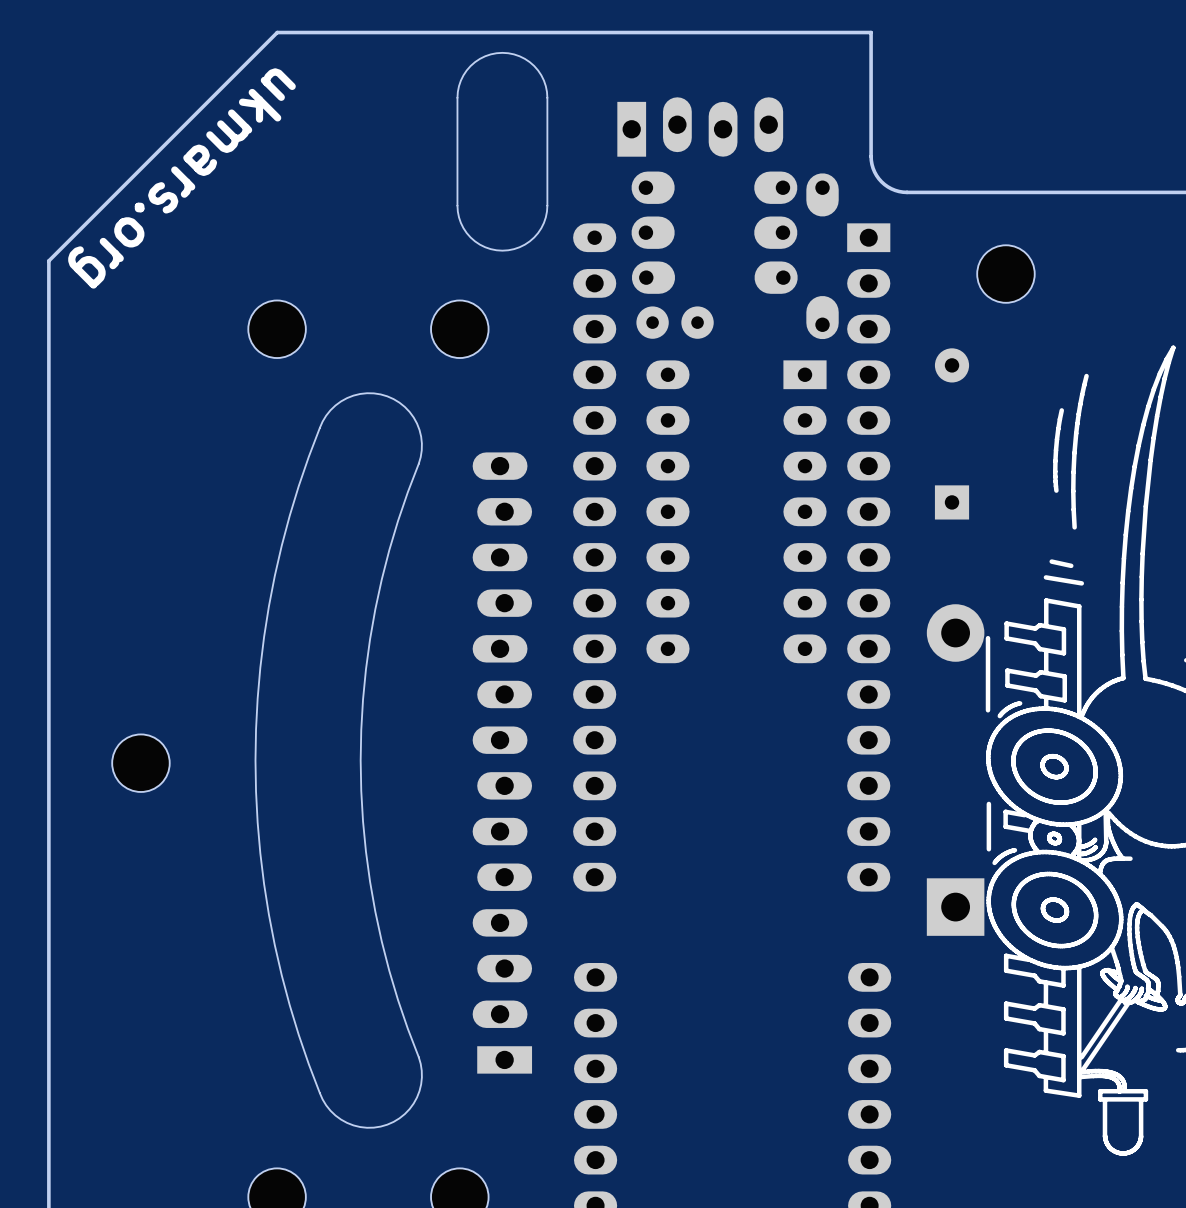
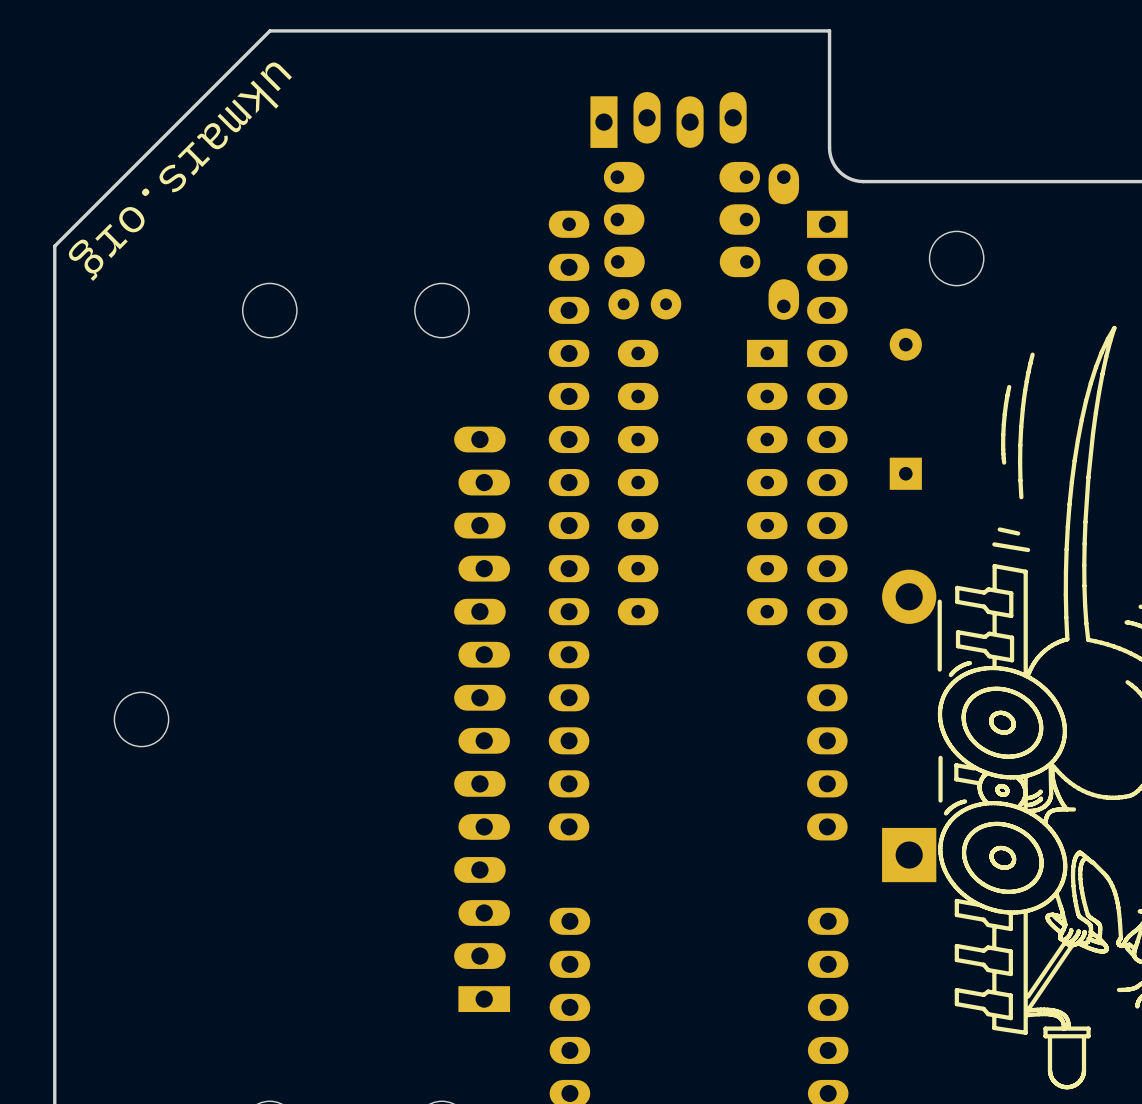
board edge: (547, 97) (547, 205) (543, 222) (534, 237) (519, 247) (502, 250) (485, 247) (475, 241) (466, 233) (460, 222) (457, 211) (457, 97) (460, 80) (466, 70) (479, 58) (496, 53) (508, 53) (519, 56) (534, 66) (543, 80) (547, 97) -> none
board edge: (319, 427) (326, 415) (341, 401) (360, 393) (373, 393) (393, 399) (409, 411) (419, 429) (421, 443) (420, 457) (389, 550) (375, 609) (363, 699) (360, 760) (363, 821) (375, 911) (389, 970) (420, 1063) (421, 1077) (417, 1097) (409, 1109) (393, 1121) (373, 1127) (353, 1125) (341, 1119) (330, 1110) (322, 1099) (308, 1064) (289, 1005) (274, 945) (264, 884) (257, 822) (256, 729) (264, 636) (281, 545) (298, 486) (319, 427) -> none

